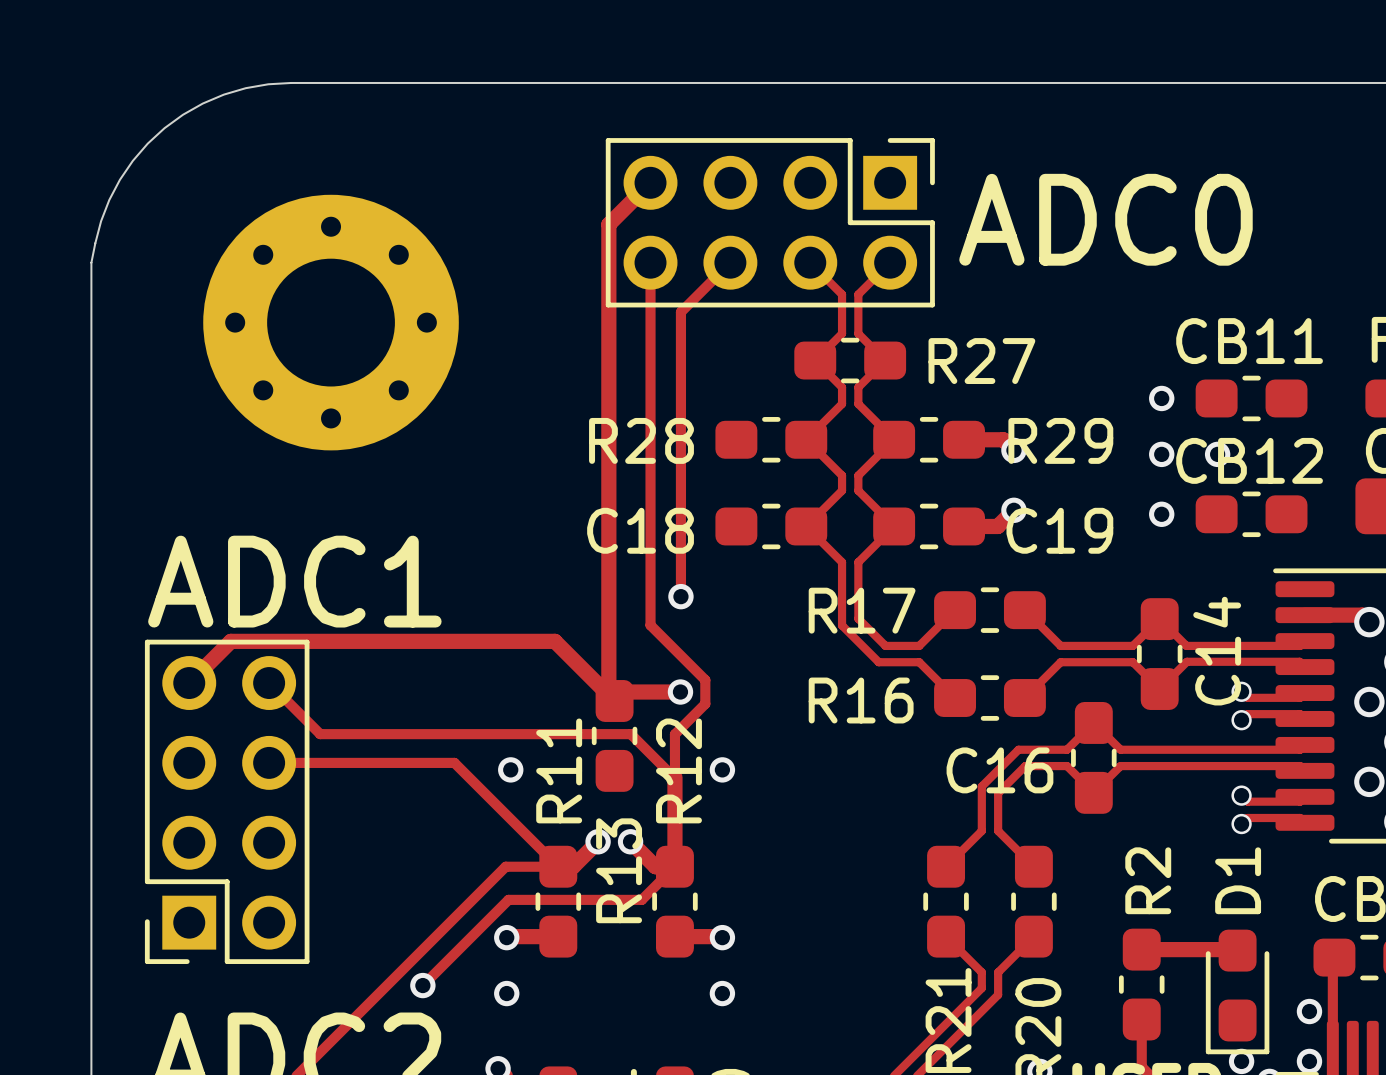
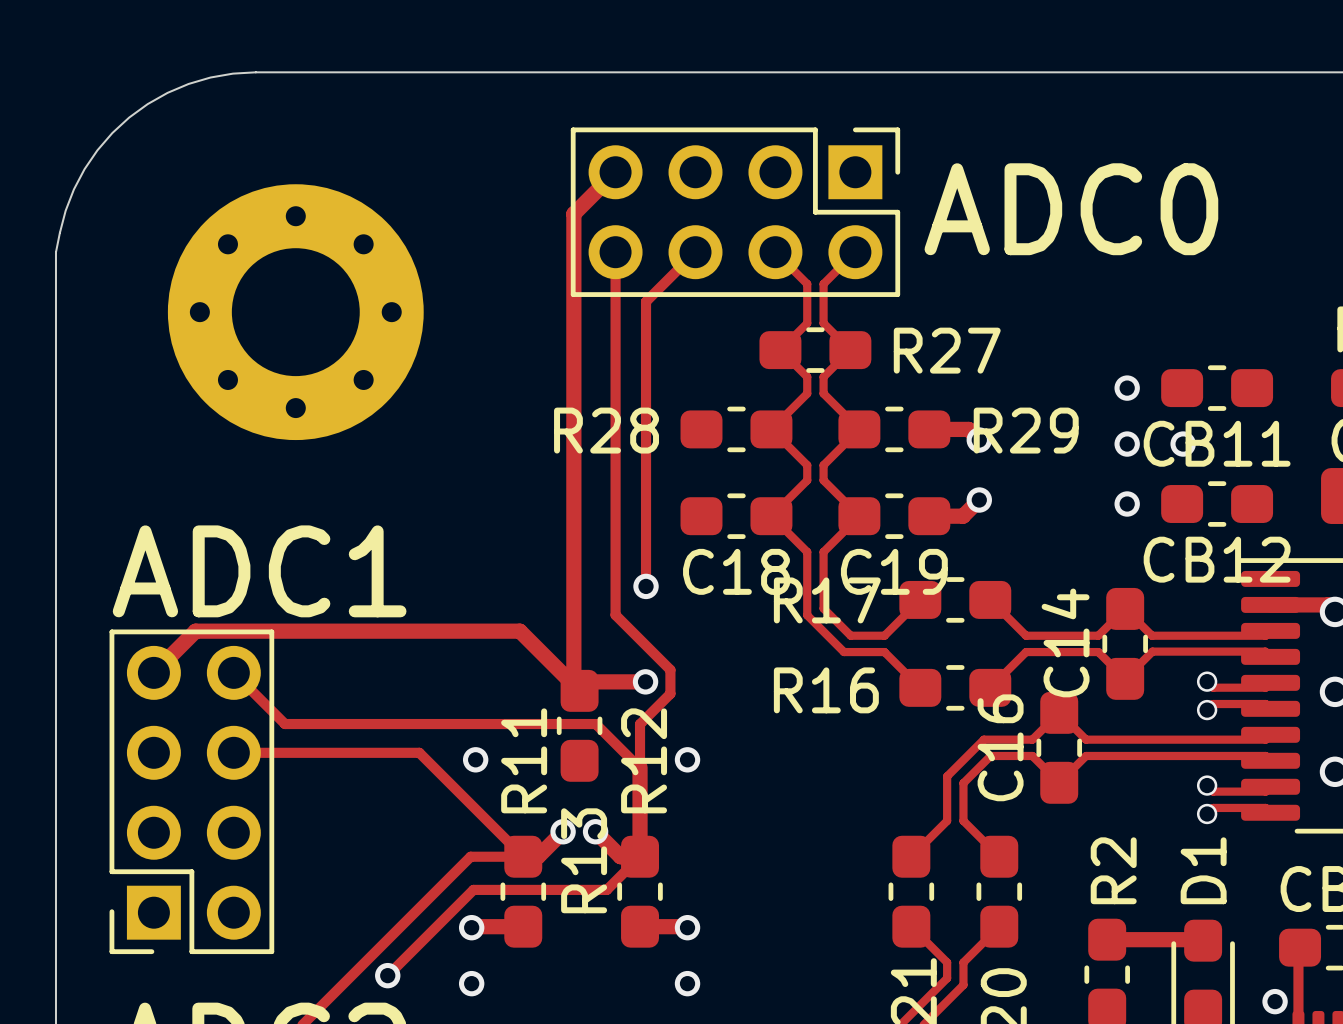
CB11 name position: CB11 (1249, 341) -> CB11 (1217, 443)
CB12 name position: CB12 (1249, 460) -> CB12 (1217, 559)
C18 name position: C18 (640, 530) -> C18 (736, 571)
C19 name position: C19 (1059, 530) -> C19 (894, 571)
C14 name position: C14 (1217, 651) -> C14 (1065, 642)
C16 name rotation: 0° (999, 770) -> 90° counterclockwise (1000, 747)

